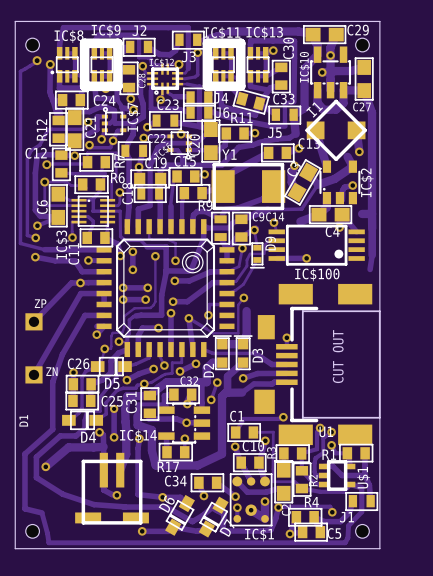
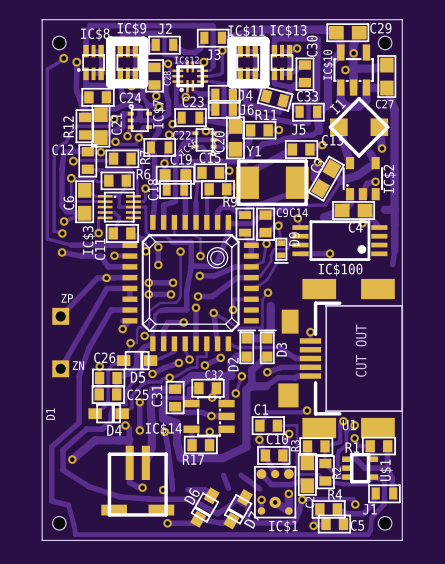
track: (139, 438) (138, 494) (162, 497) -> (164, 431) (172, 489)
C34: (207, 482) -> none
via: (203, 495) -> none
via: (235, 496) -> none
via position: (162, 497) -> (163, 490)

